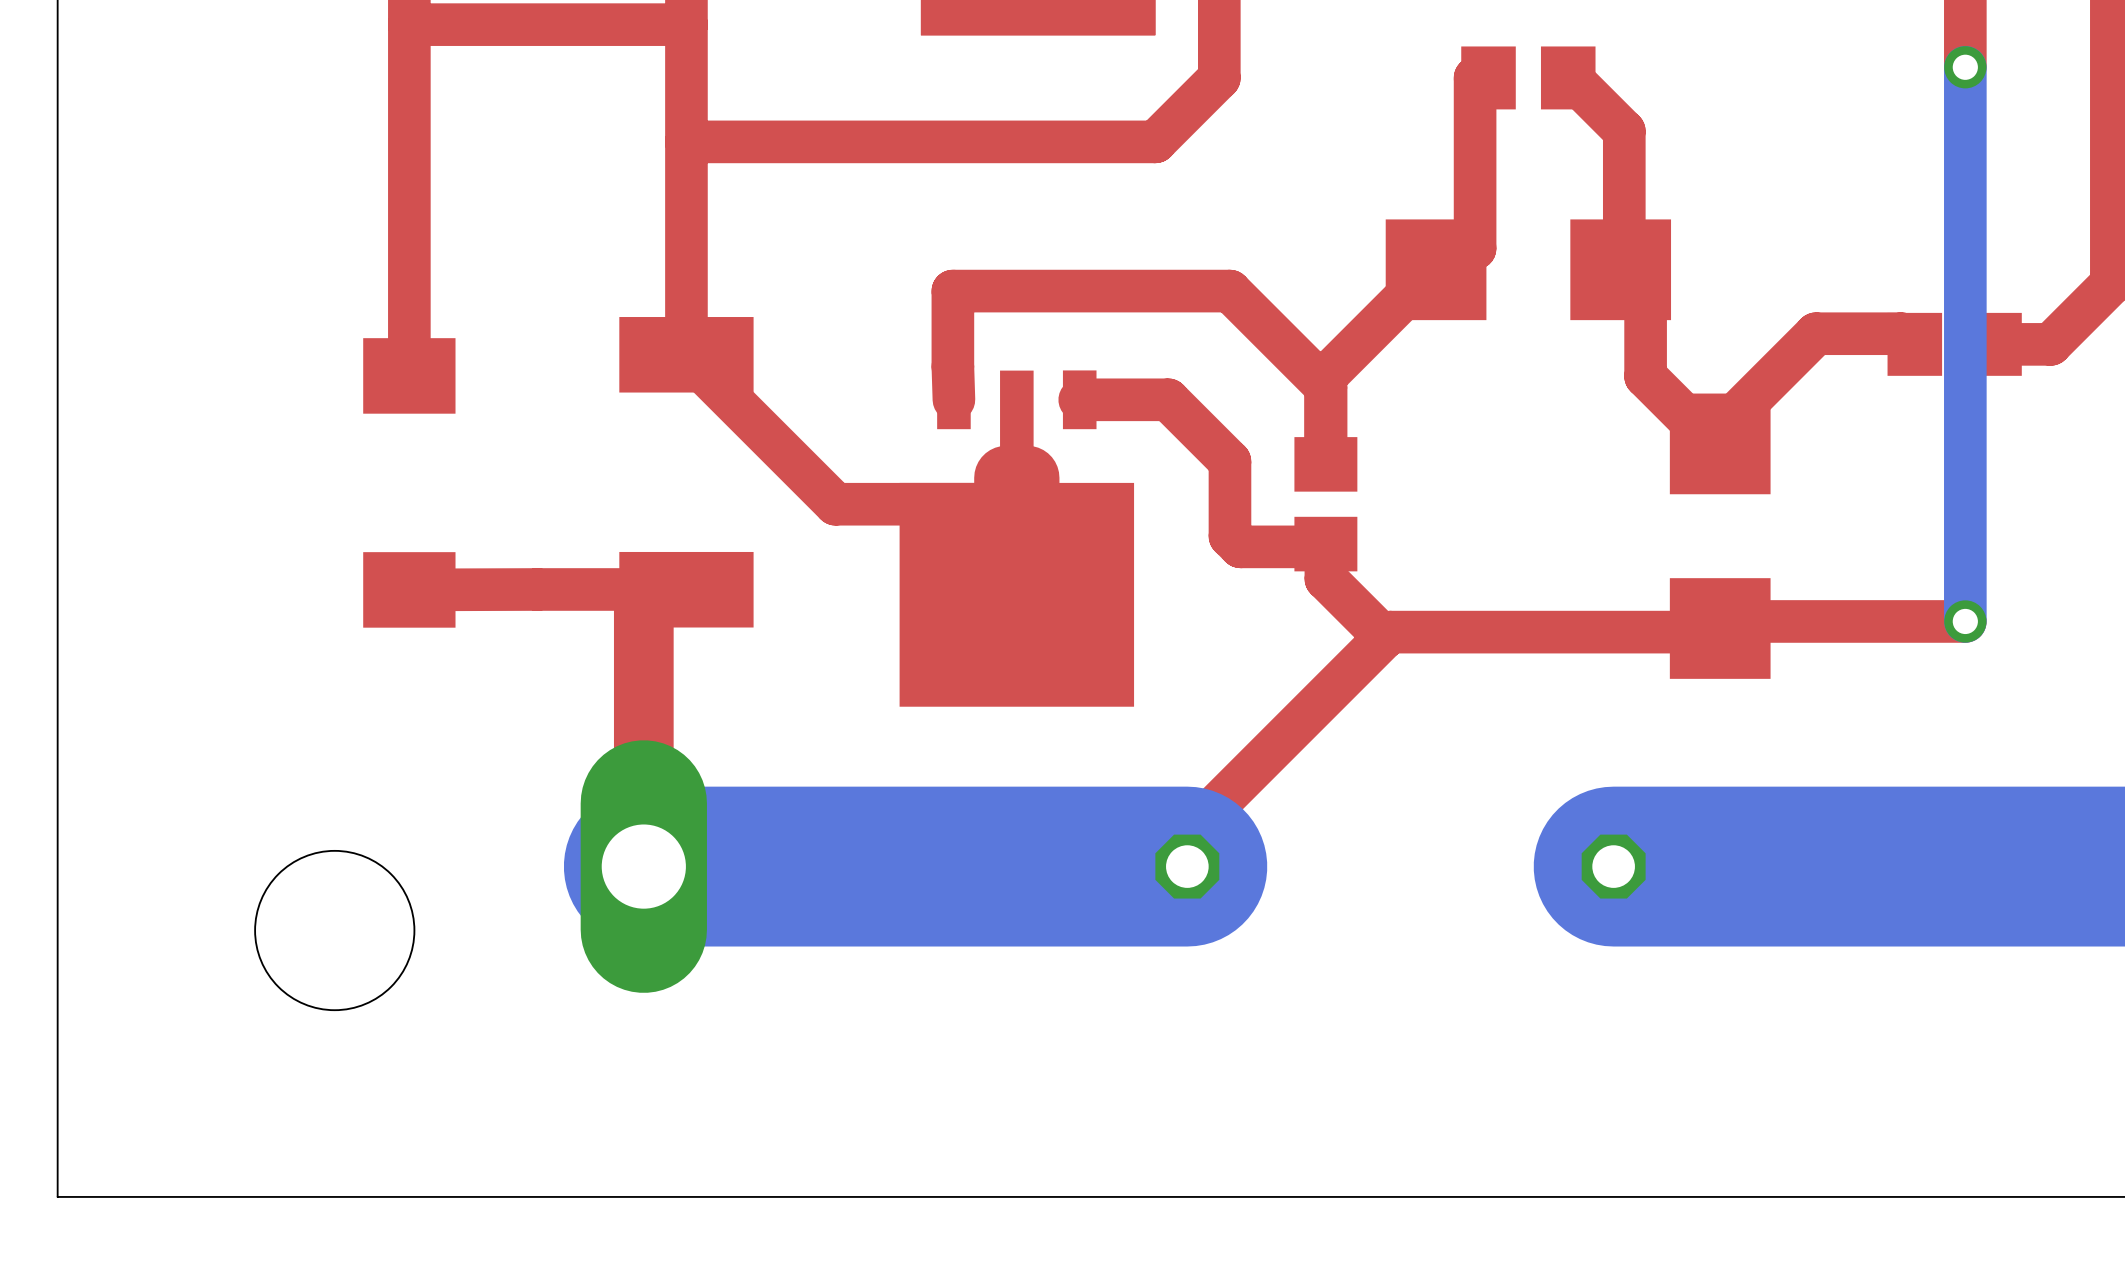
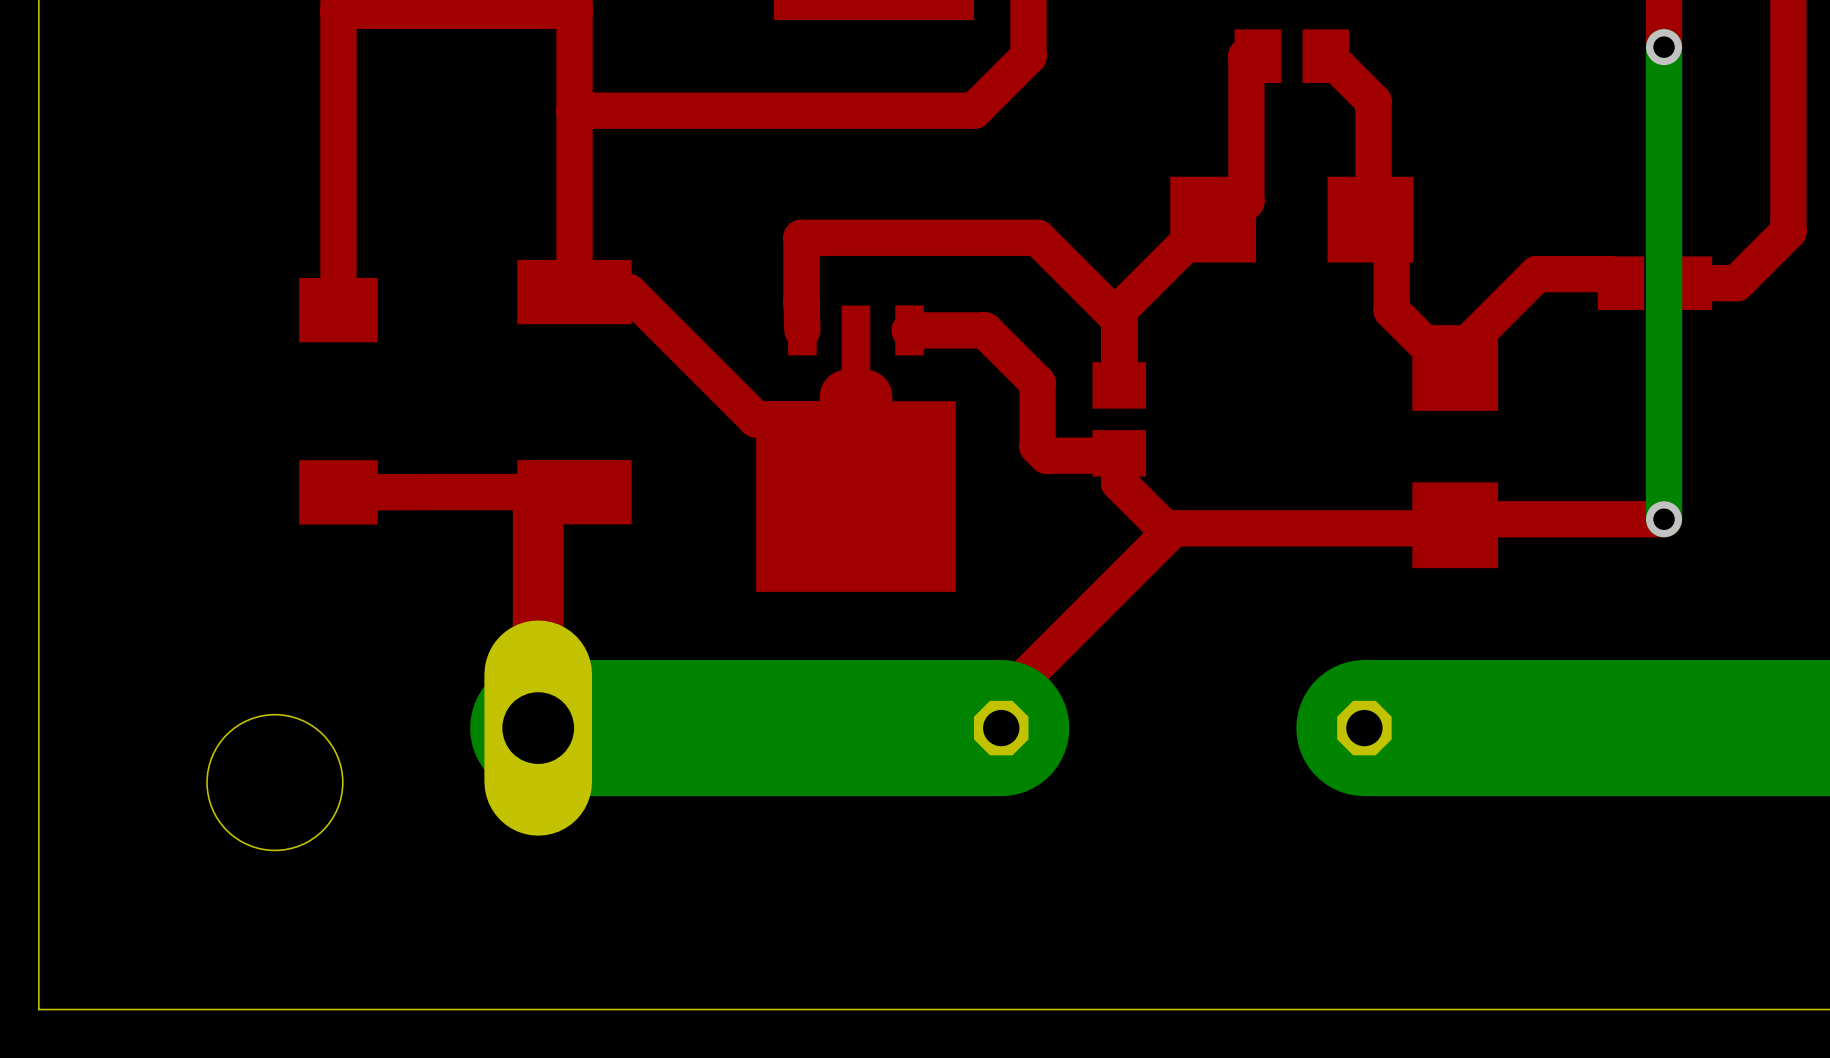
top track: (686, 355) (835, 504) (899, 504) -> (574, 292) (629, 292) (756, 419)

